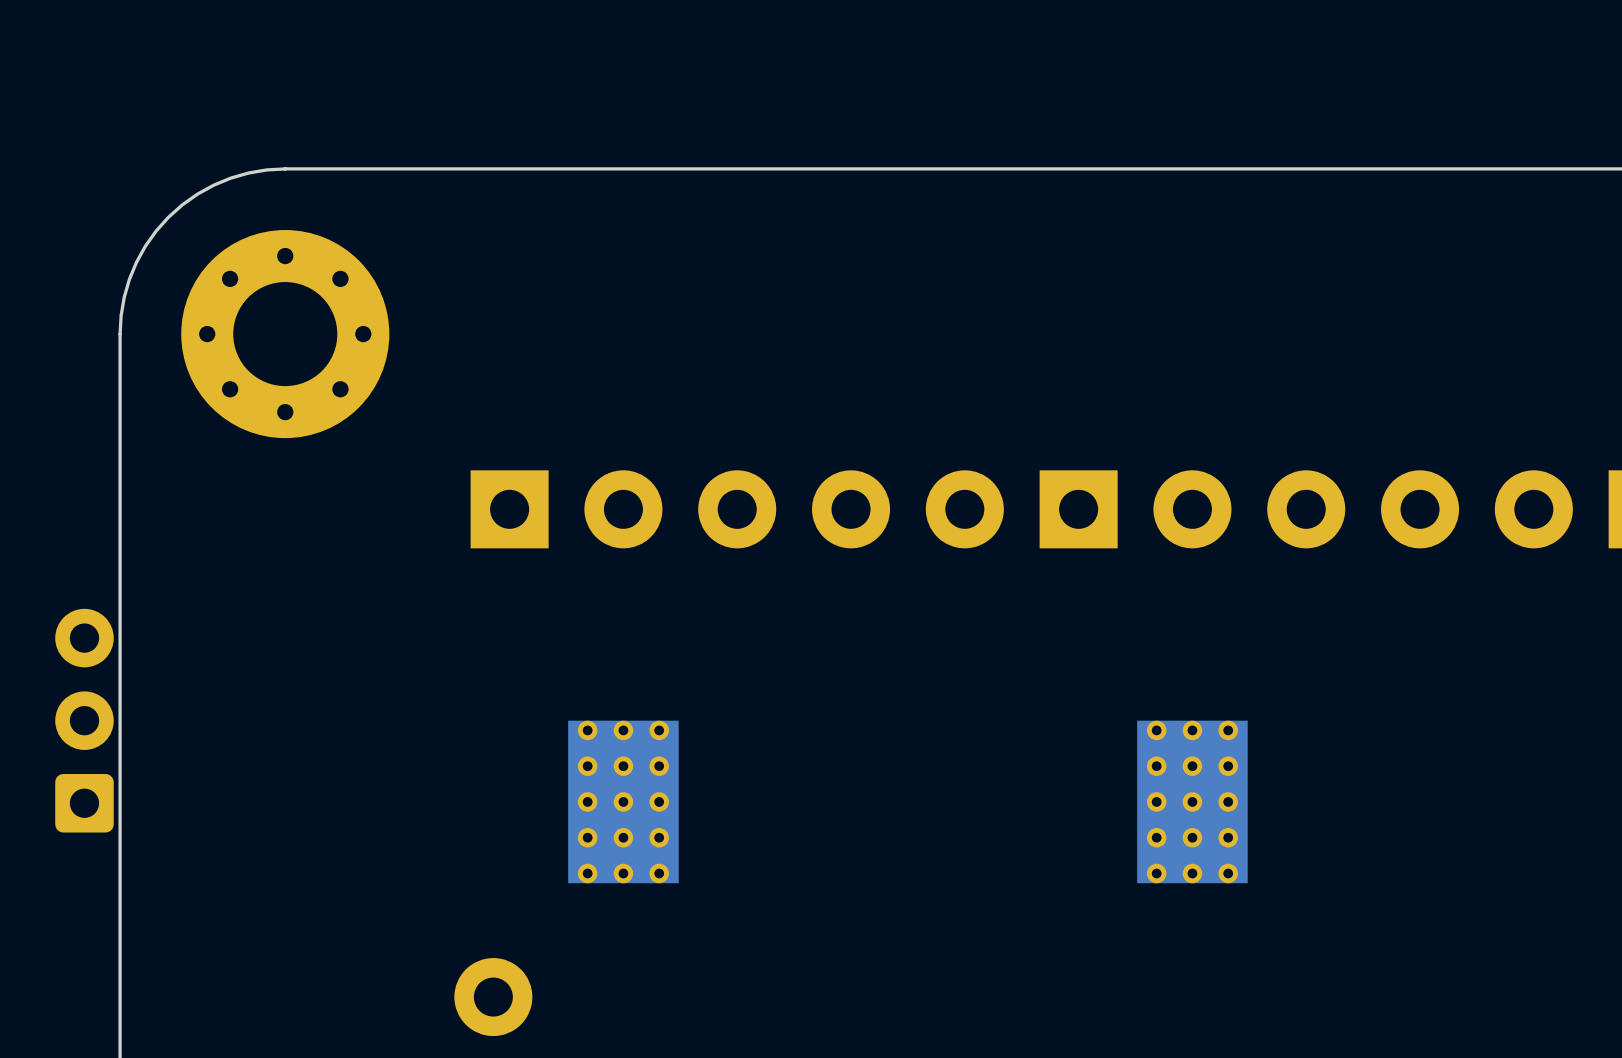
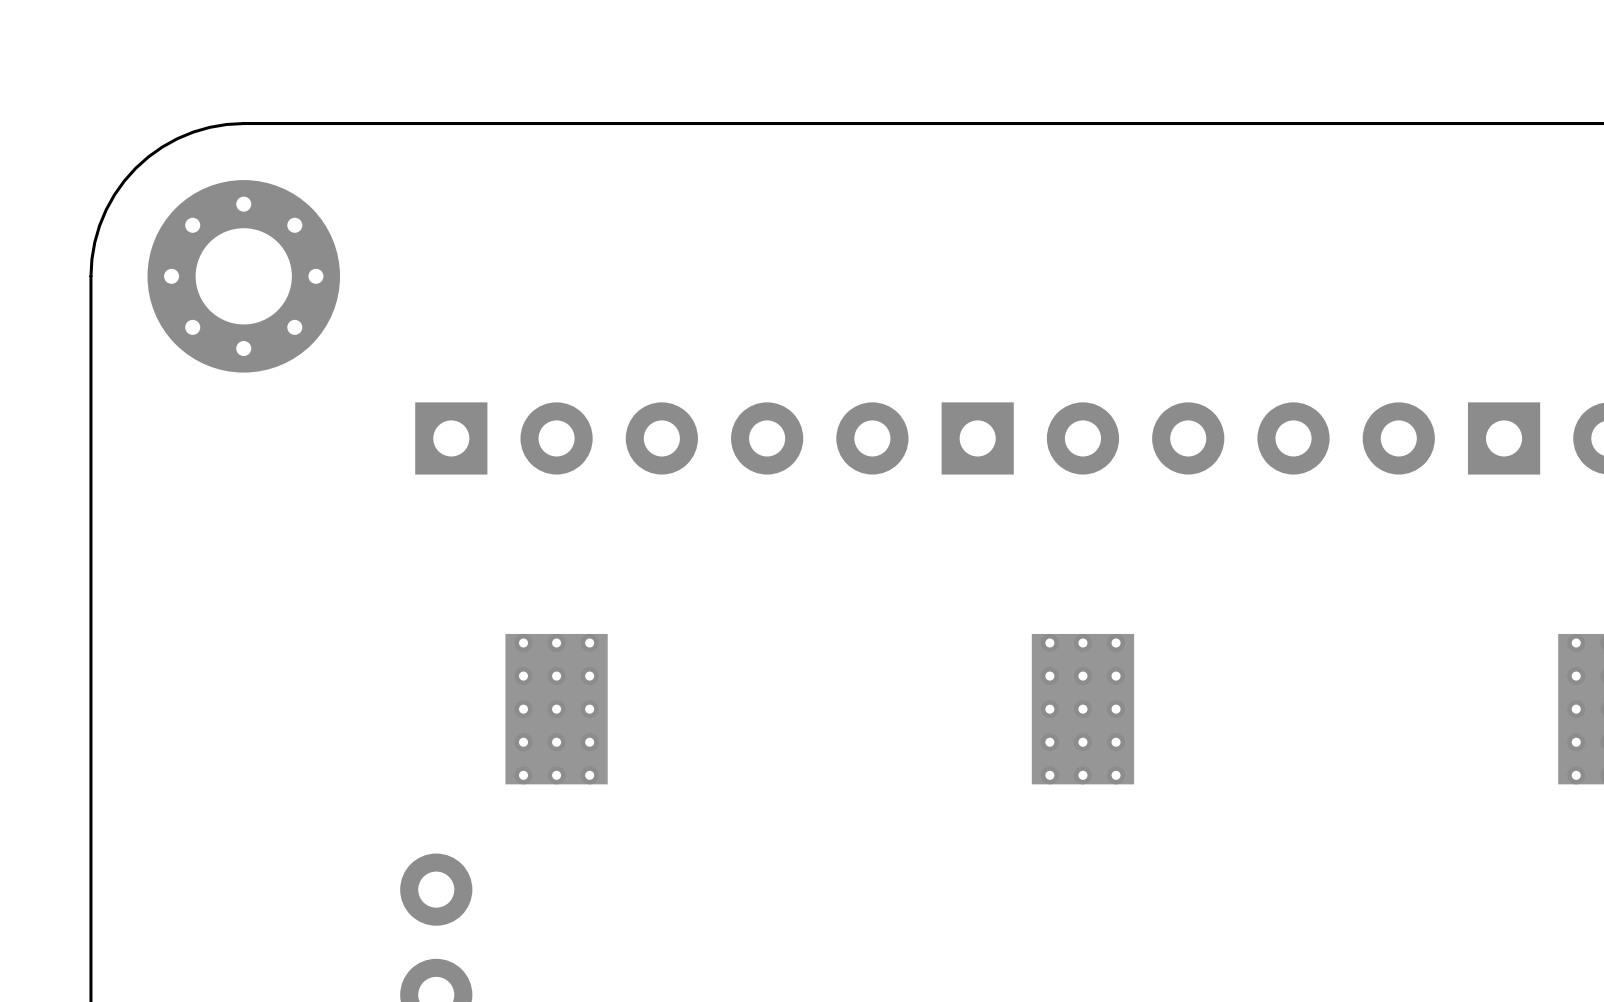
part: (84, 720) -> none

